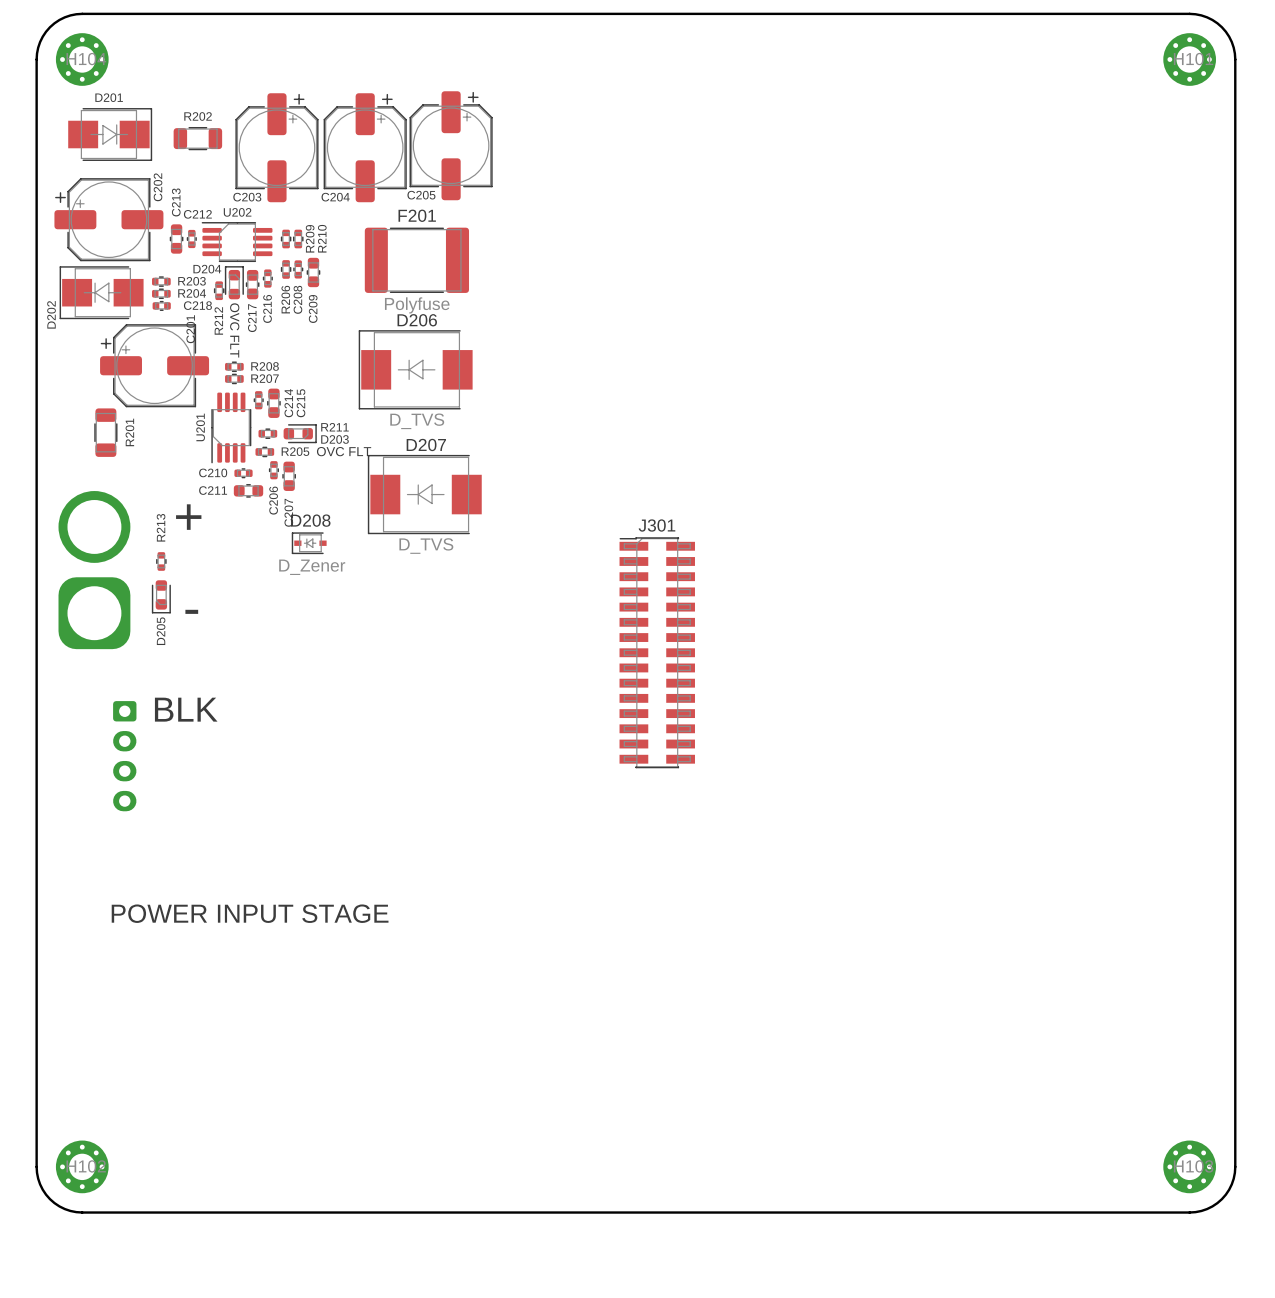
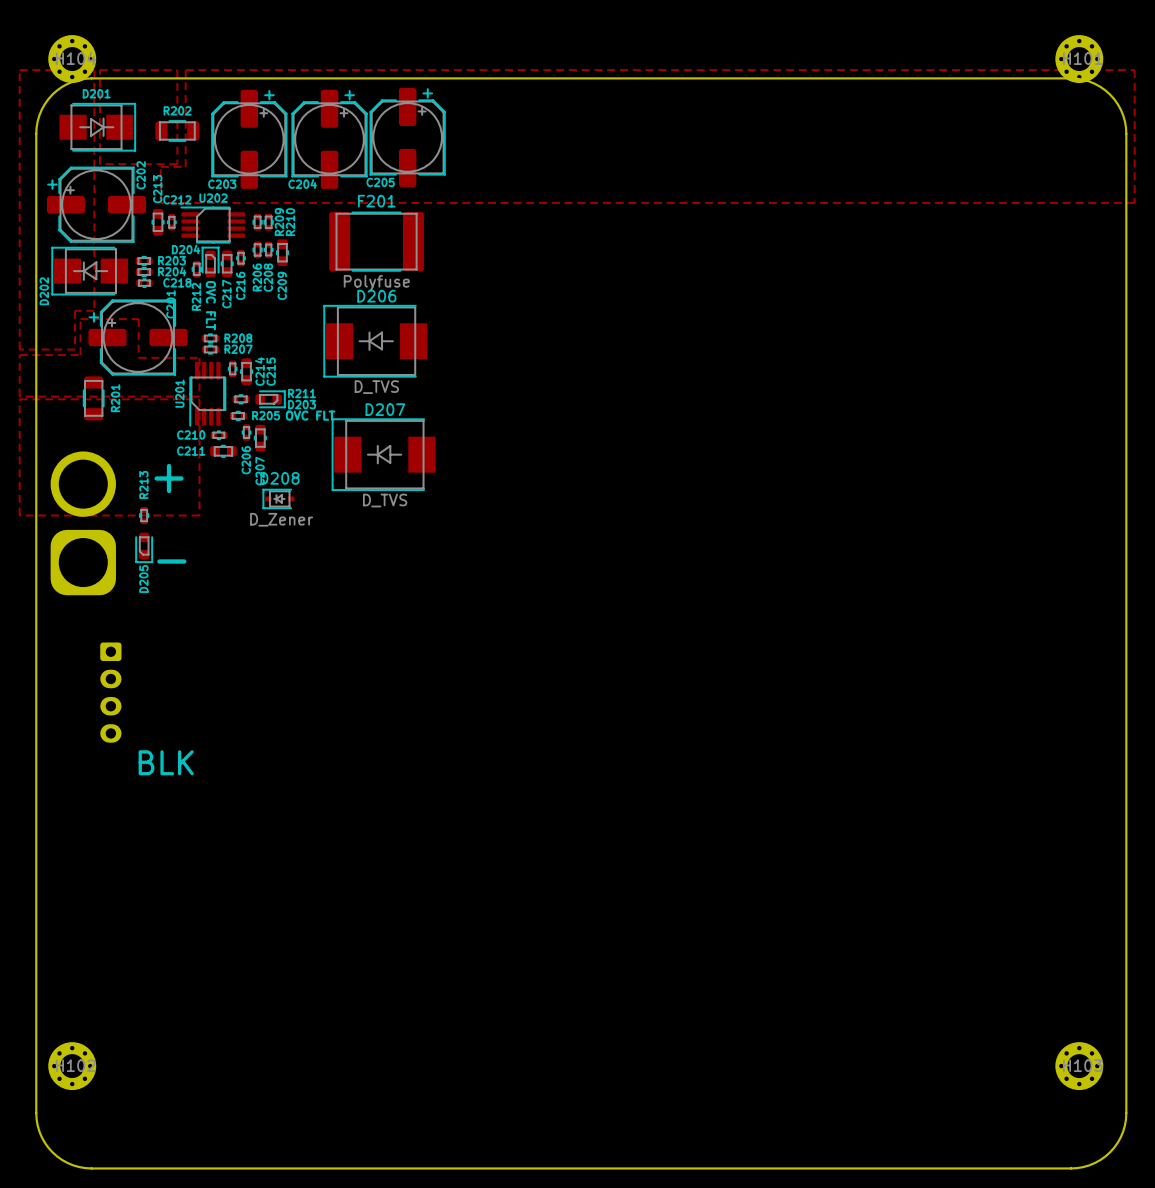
board edge: (82, 13) (1189, 13) (1207, 17) (1221, 27) (1231, 42) (1235, 59) (1235, 1166) (1231, 1184) (1221, 1199) (1207, 1209) (1189, 1212) (82, 1212) (64, 1209) (50, 1199) (40, 1184) (36, 1166) (36, 59) (40, 42) (50, 27) (64, 17) (82, 13) -> (91, 78) (67, 83) (52, 94) (39, 115) (36, 133) (36, 1113) (39, 1131) (52, 1152) (67, 1162) (91, 1168) (1071, 1168) (1089, 1165) (1110, 1152) (1123, 1131) (1126, 1113) (1126, 133) (1123, 115) (1110, 94) (1089, 81) (1071, 78) (91, 78)
zone outline: none -> (19, 70) (94, 70) (94, 310) (75, 310) (75, 349) (19, 349) (19, 70)
zone outline: none -> (99, 70) (177, 70) (177, 164) (99, 164) (99, 70)
zone outline: none -> (185, 70) (185, 166) (160, 166) (160, 202) (1134, 202) (1134, 70) (185, 70)
zone outline: none -> (80, 319) (80, 355) (19, 355) (19, 396) (199, 396) (199, 357) (138, 357) (138, 319) (80, 319)
zone outline: none -> (19, 399) (19, 515) (199, 515) (199, 399) (19, 399)
J301: (657, 652) -> none
text position: BLK (186, 709) -> BLK (166, 762)
text: POWER INPUT STAGE (250, 913) -> none

